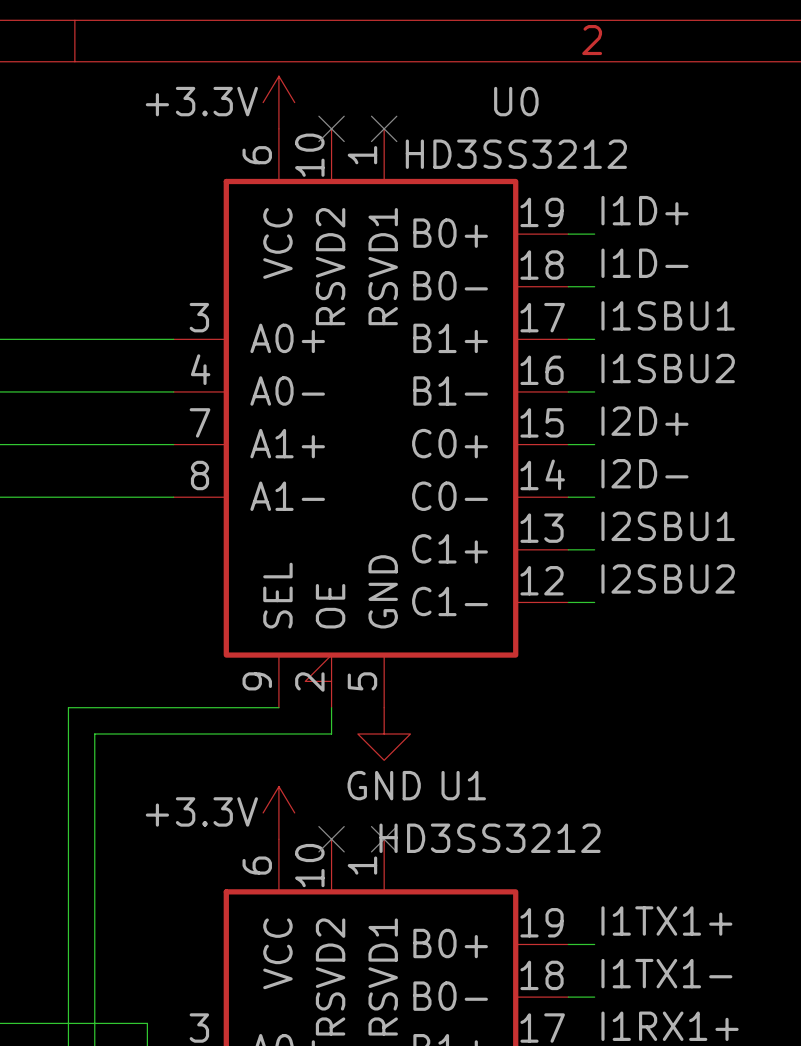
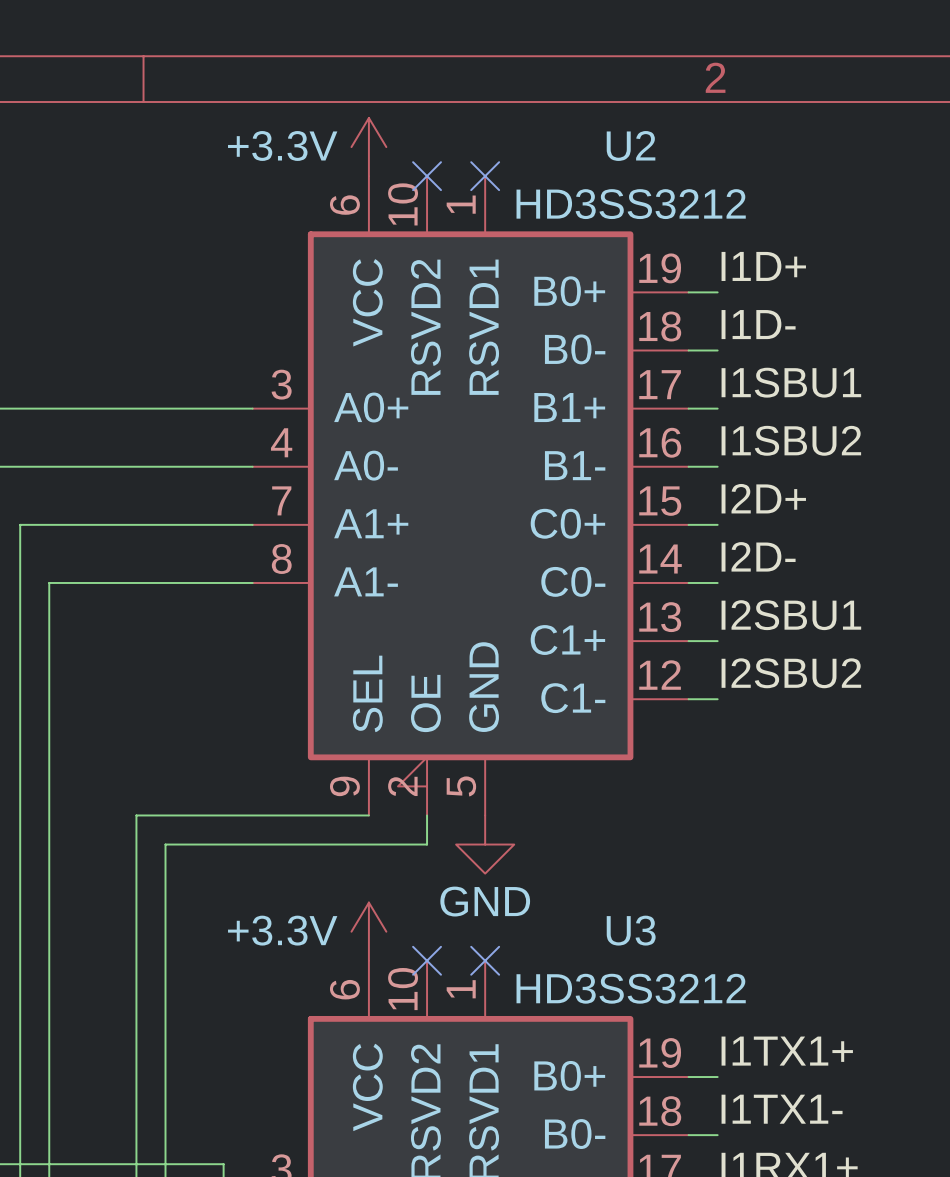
U0 name: U0 (516, 101) -> U2 (631, 145)
U1 name: U1 (463, 785) -> U3 (631, 930)
U1 value position: HD3SS3212 (490, 838) -> HD3SS3212 (631, 988)

